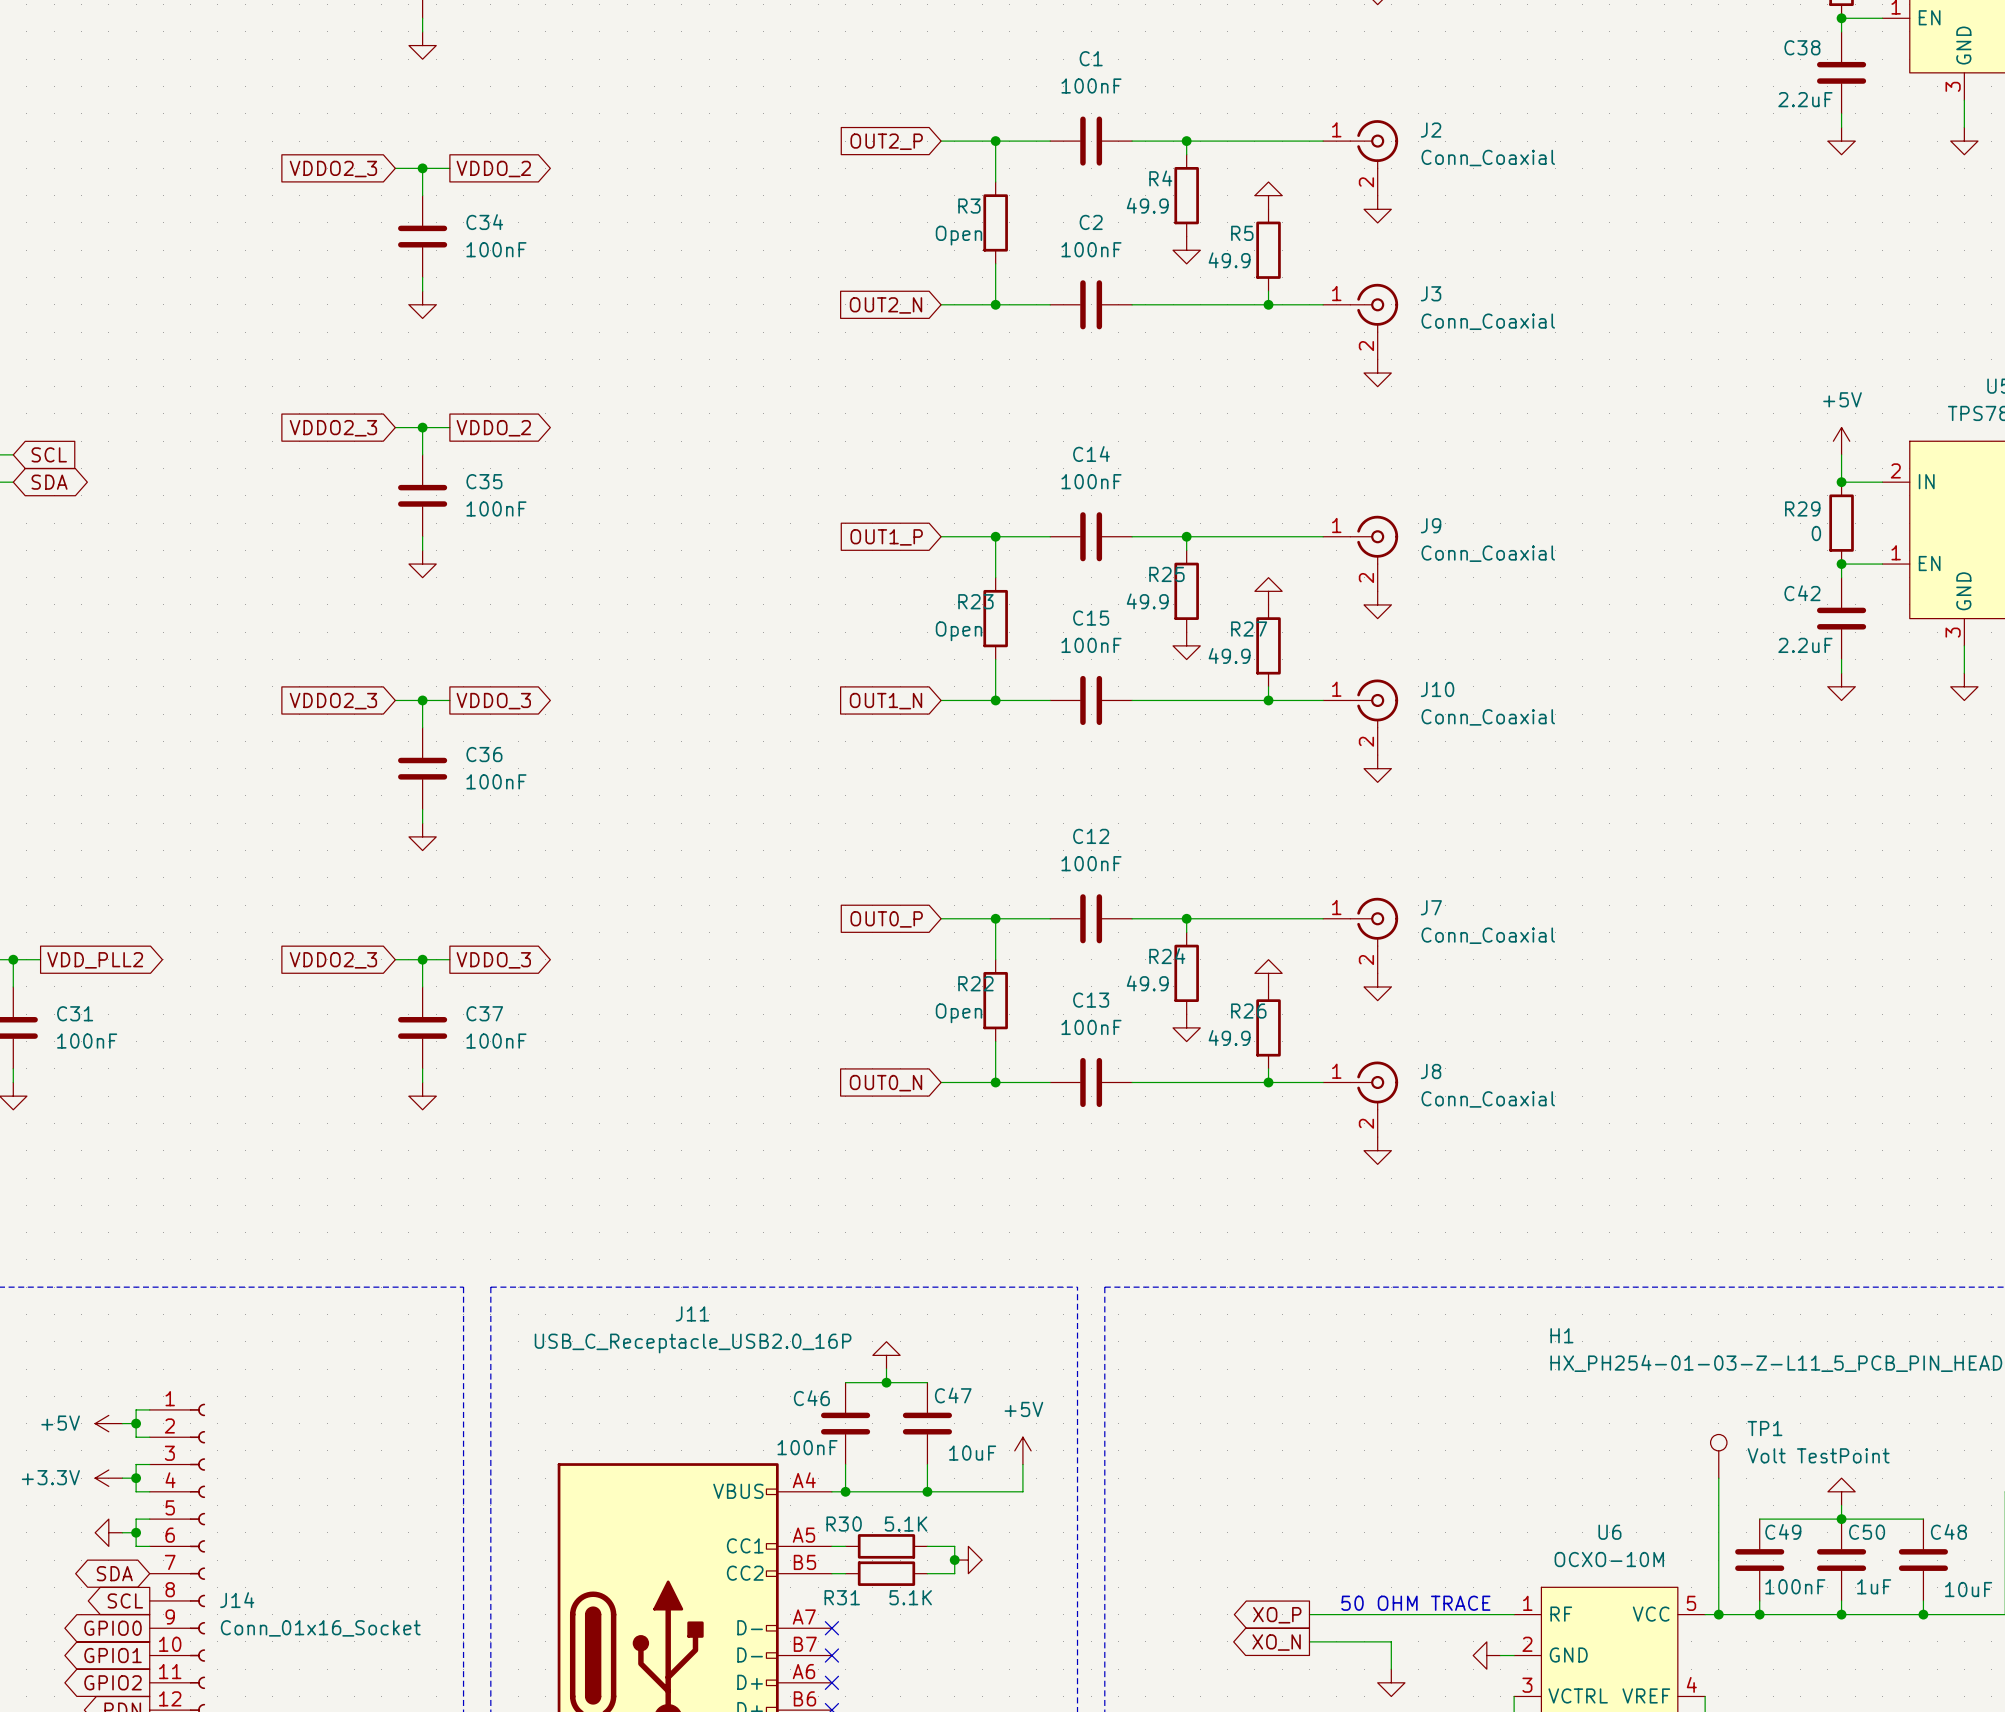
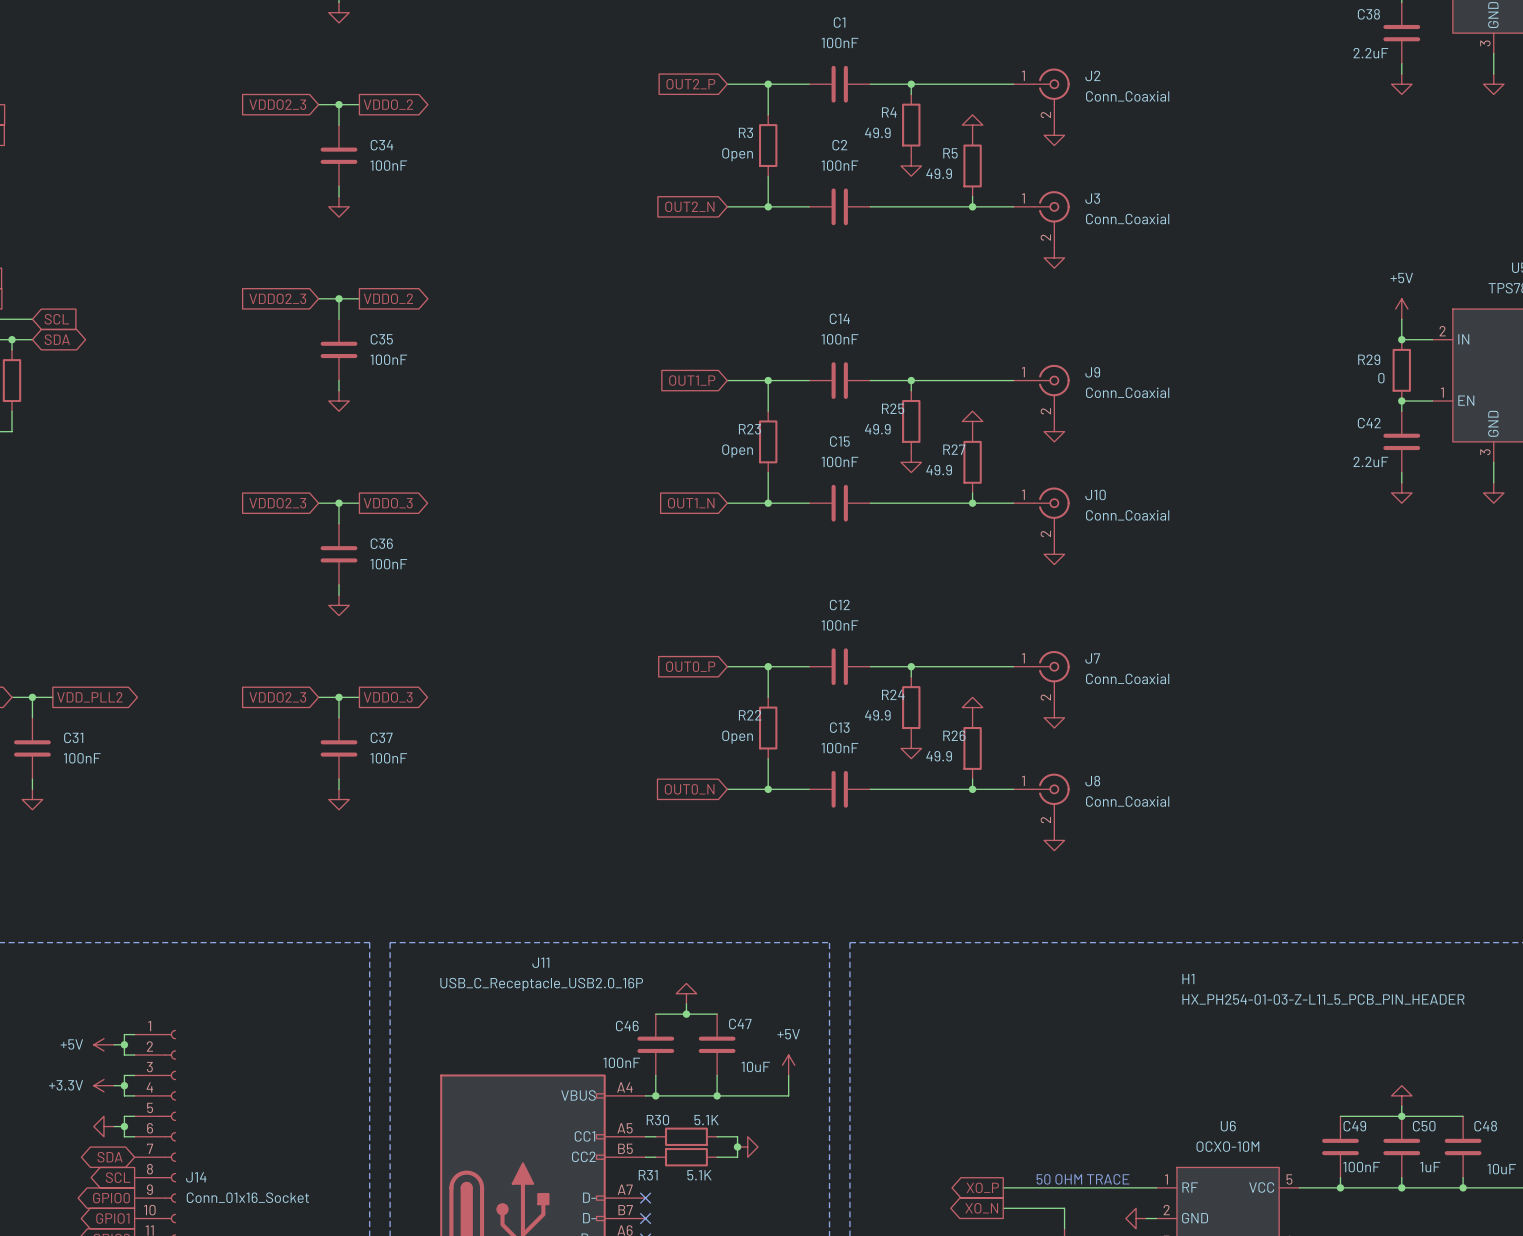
TP1: Volt TestPoint (1718, 1456) -> none
wire: (1718, 1478) (1718, 1614) -> none
junction: (1718, 1614) -> none

